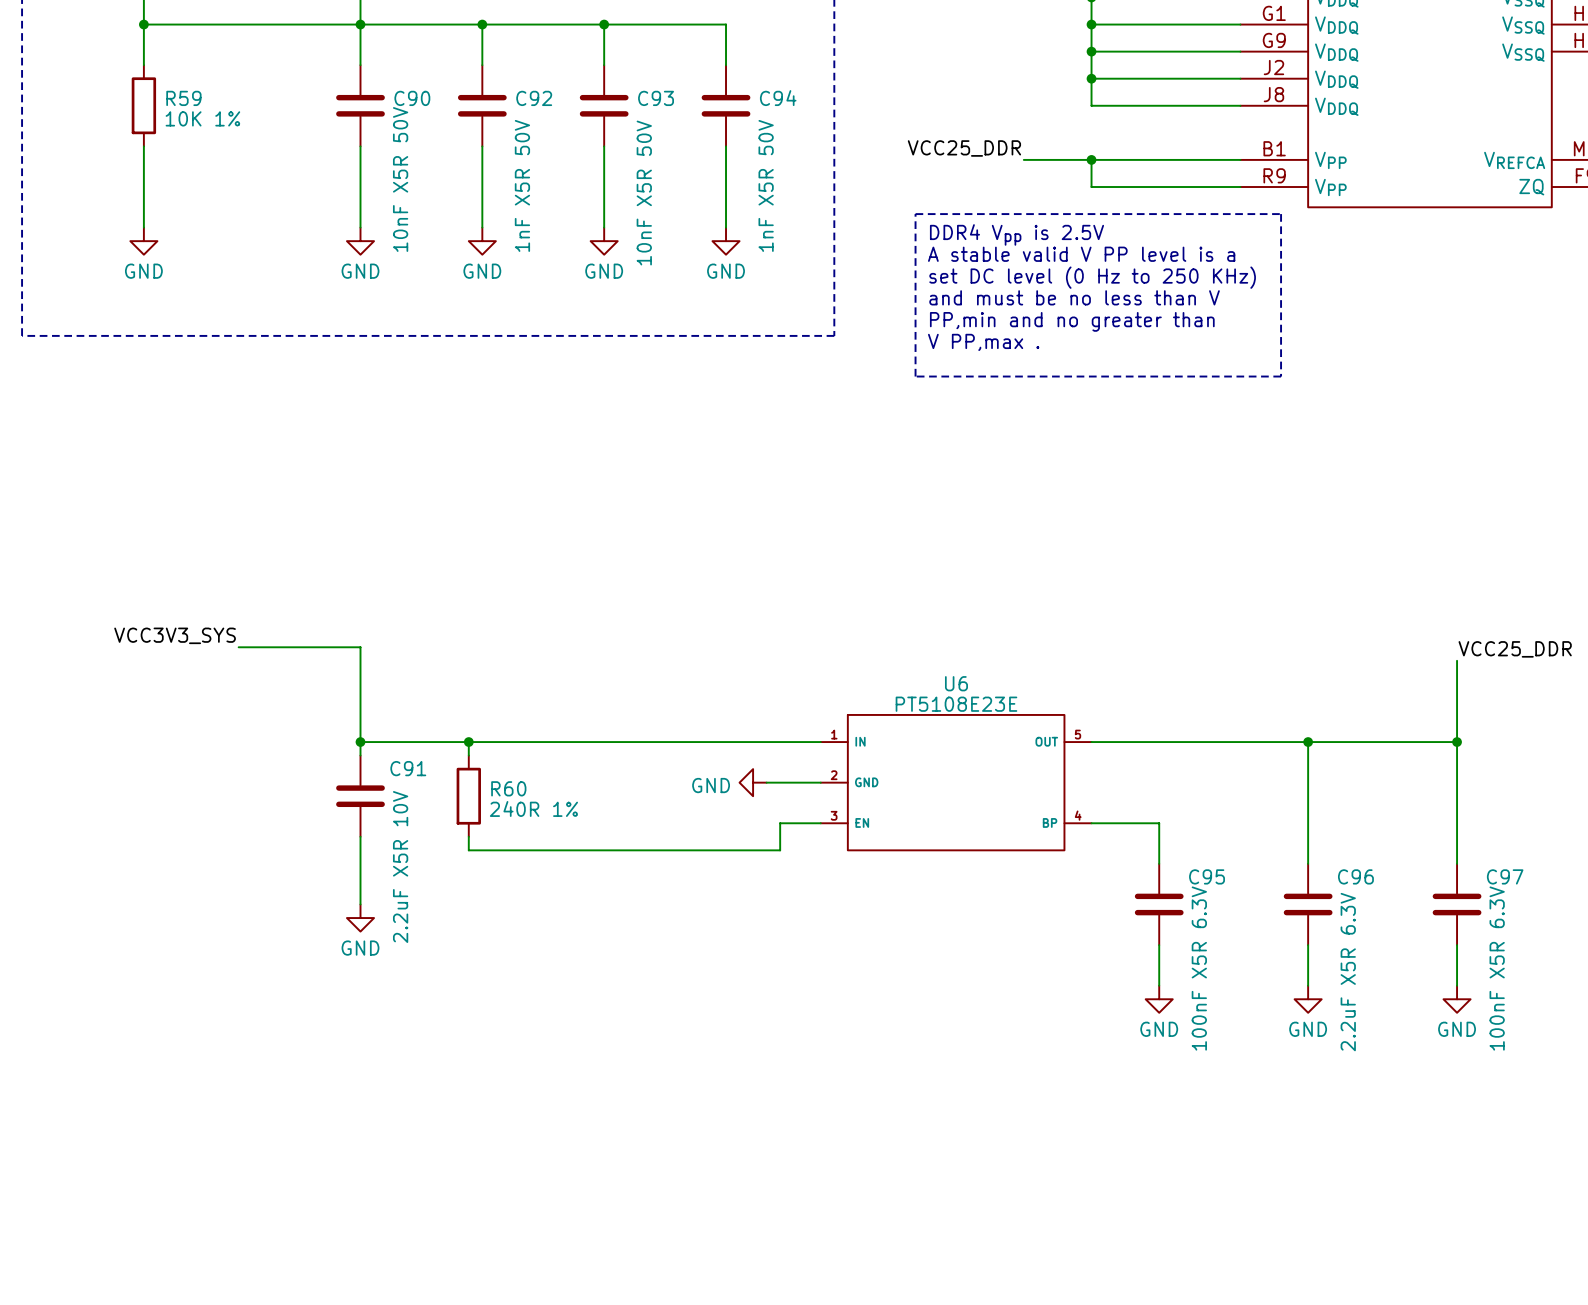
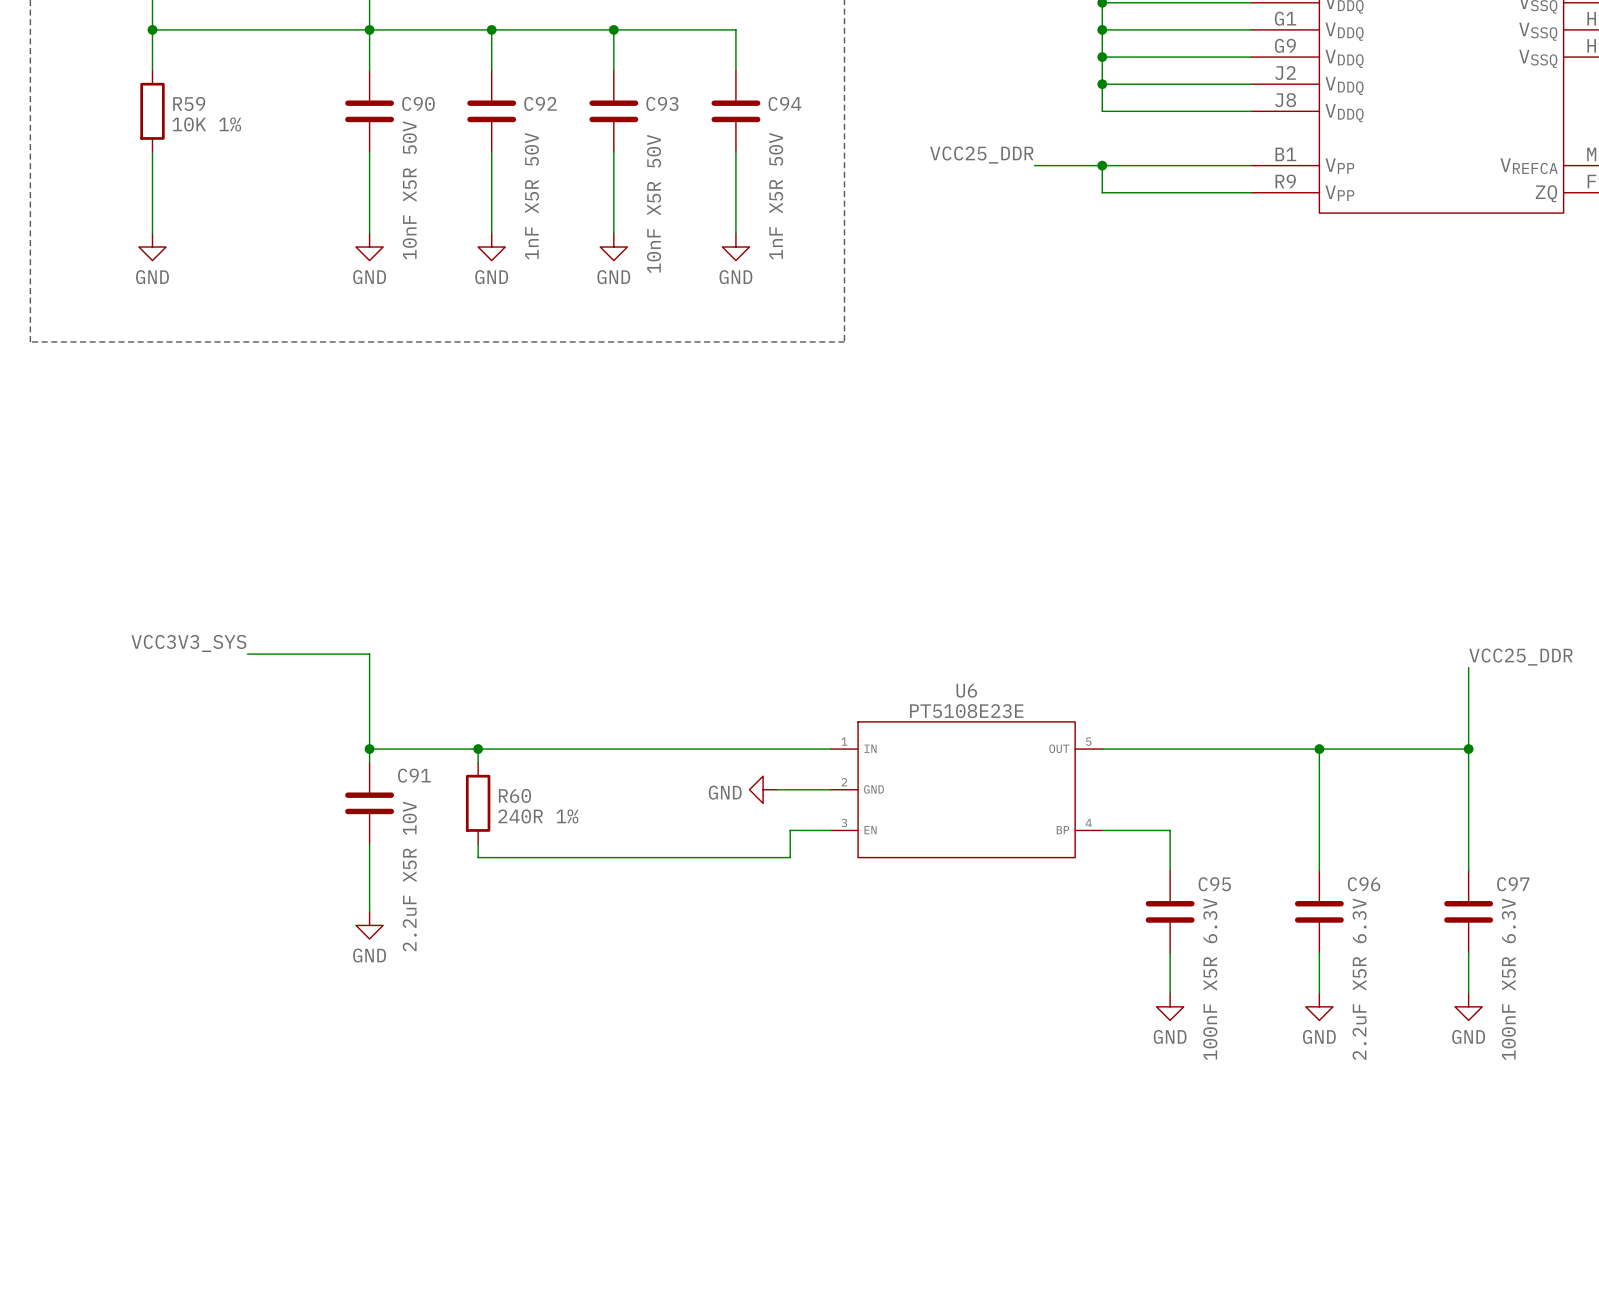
line: (915, 214) (1281, 214) (1281, 376) (915, 376) (915, 214) -> none
text: DDR4 Vpp is 2.5V (1016, 234) -> none
text: A stable valid V PP level is a (1081, 254) -> none
text: set DC level (0 Hz to 250 KHz) (1092, 277) -> none
text: and must be no less than V (1074, 297) -> none
text: PP,min and no greater than (1072, 321) -> none
text: V PP,max . (983, 342) -> none

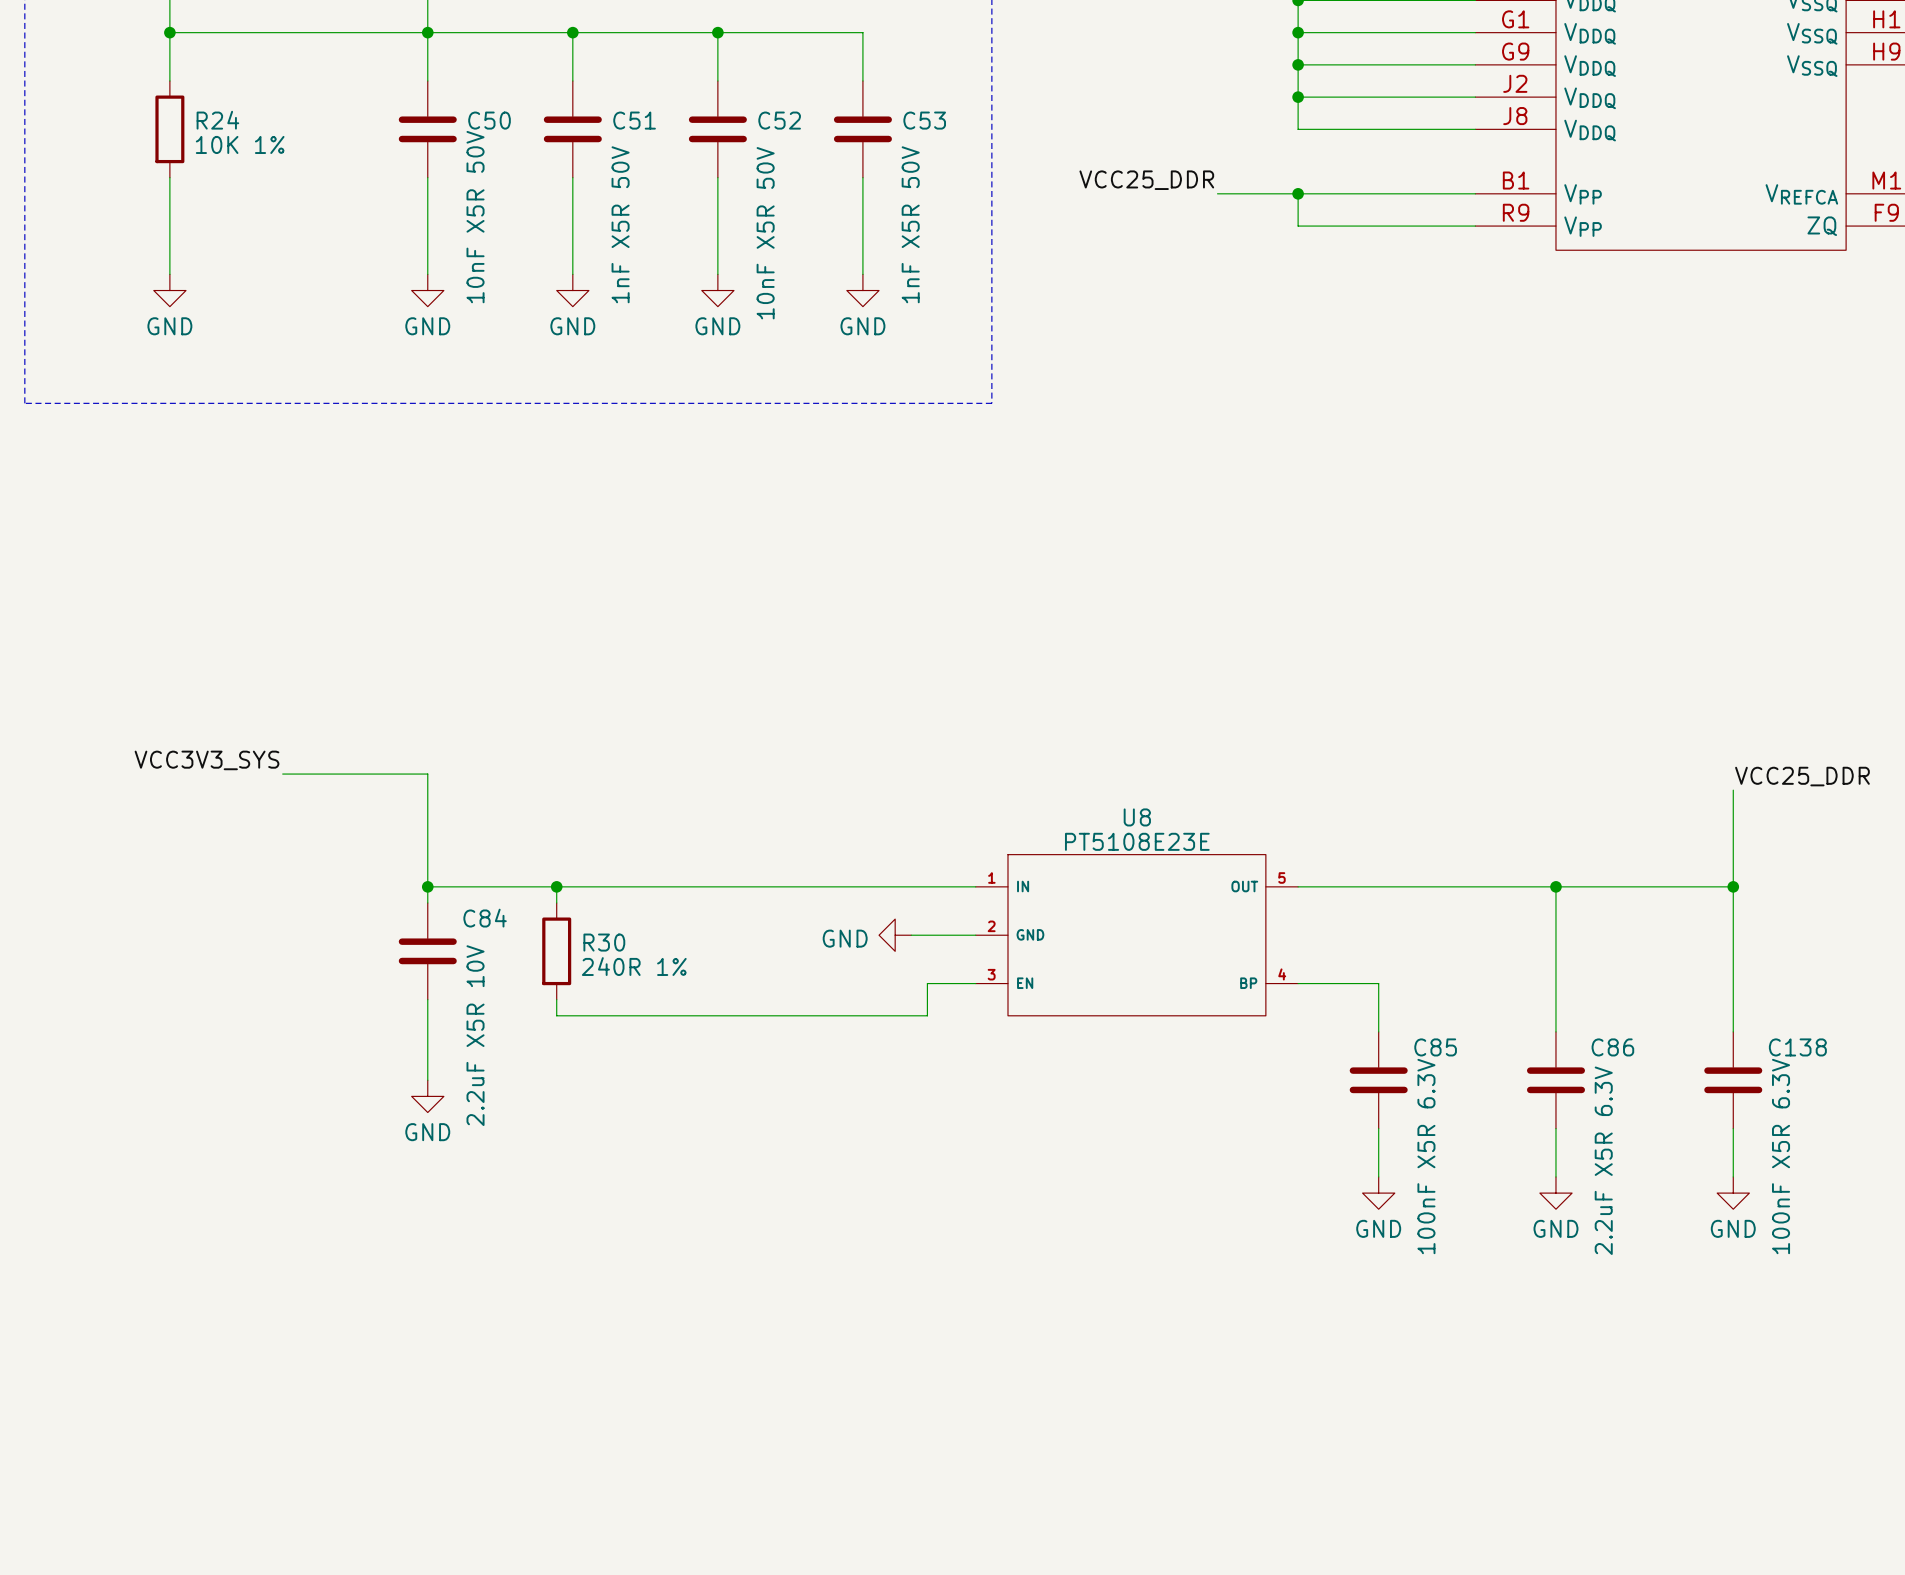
R59 name: R59 (189, 103) -> R24 (217, 120)
C90 name: C90 (418, 103) -> C50 (489, 120)
C92 name: C92 (540, 103) -> C51 (634, 120)
C93 name: C93 (662, 103) -> C52 (779, 120)
C94 name: C94 (784, 103) -> C53 (924, 120)
U6 name: U6 (966, 690) -> U8 (1137, 817)
C91 name: C91 (414, 775) -> C84 (485, 918)
R60 name: R60 (514, 795) -> R30 (604, 942)
C95 name: C95 (1214, 884) -> C85 (1435, 1047)
C96 name: C96 (1364, 884) -> C86 (1612, 1047)
C97 name: C97 (1513, 884) -> C138 (1797, 1047)

